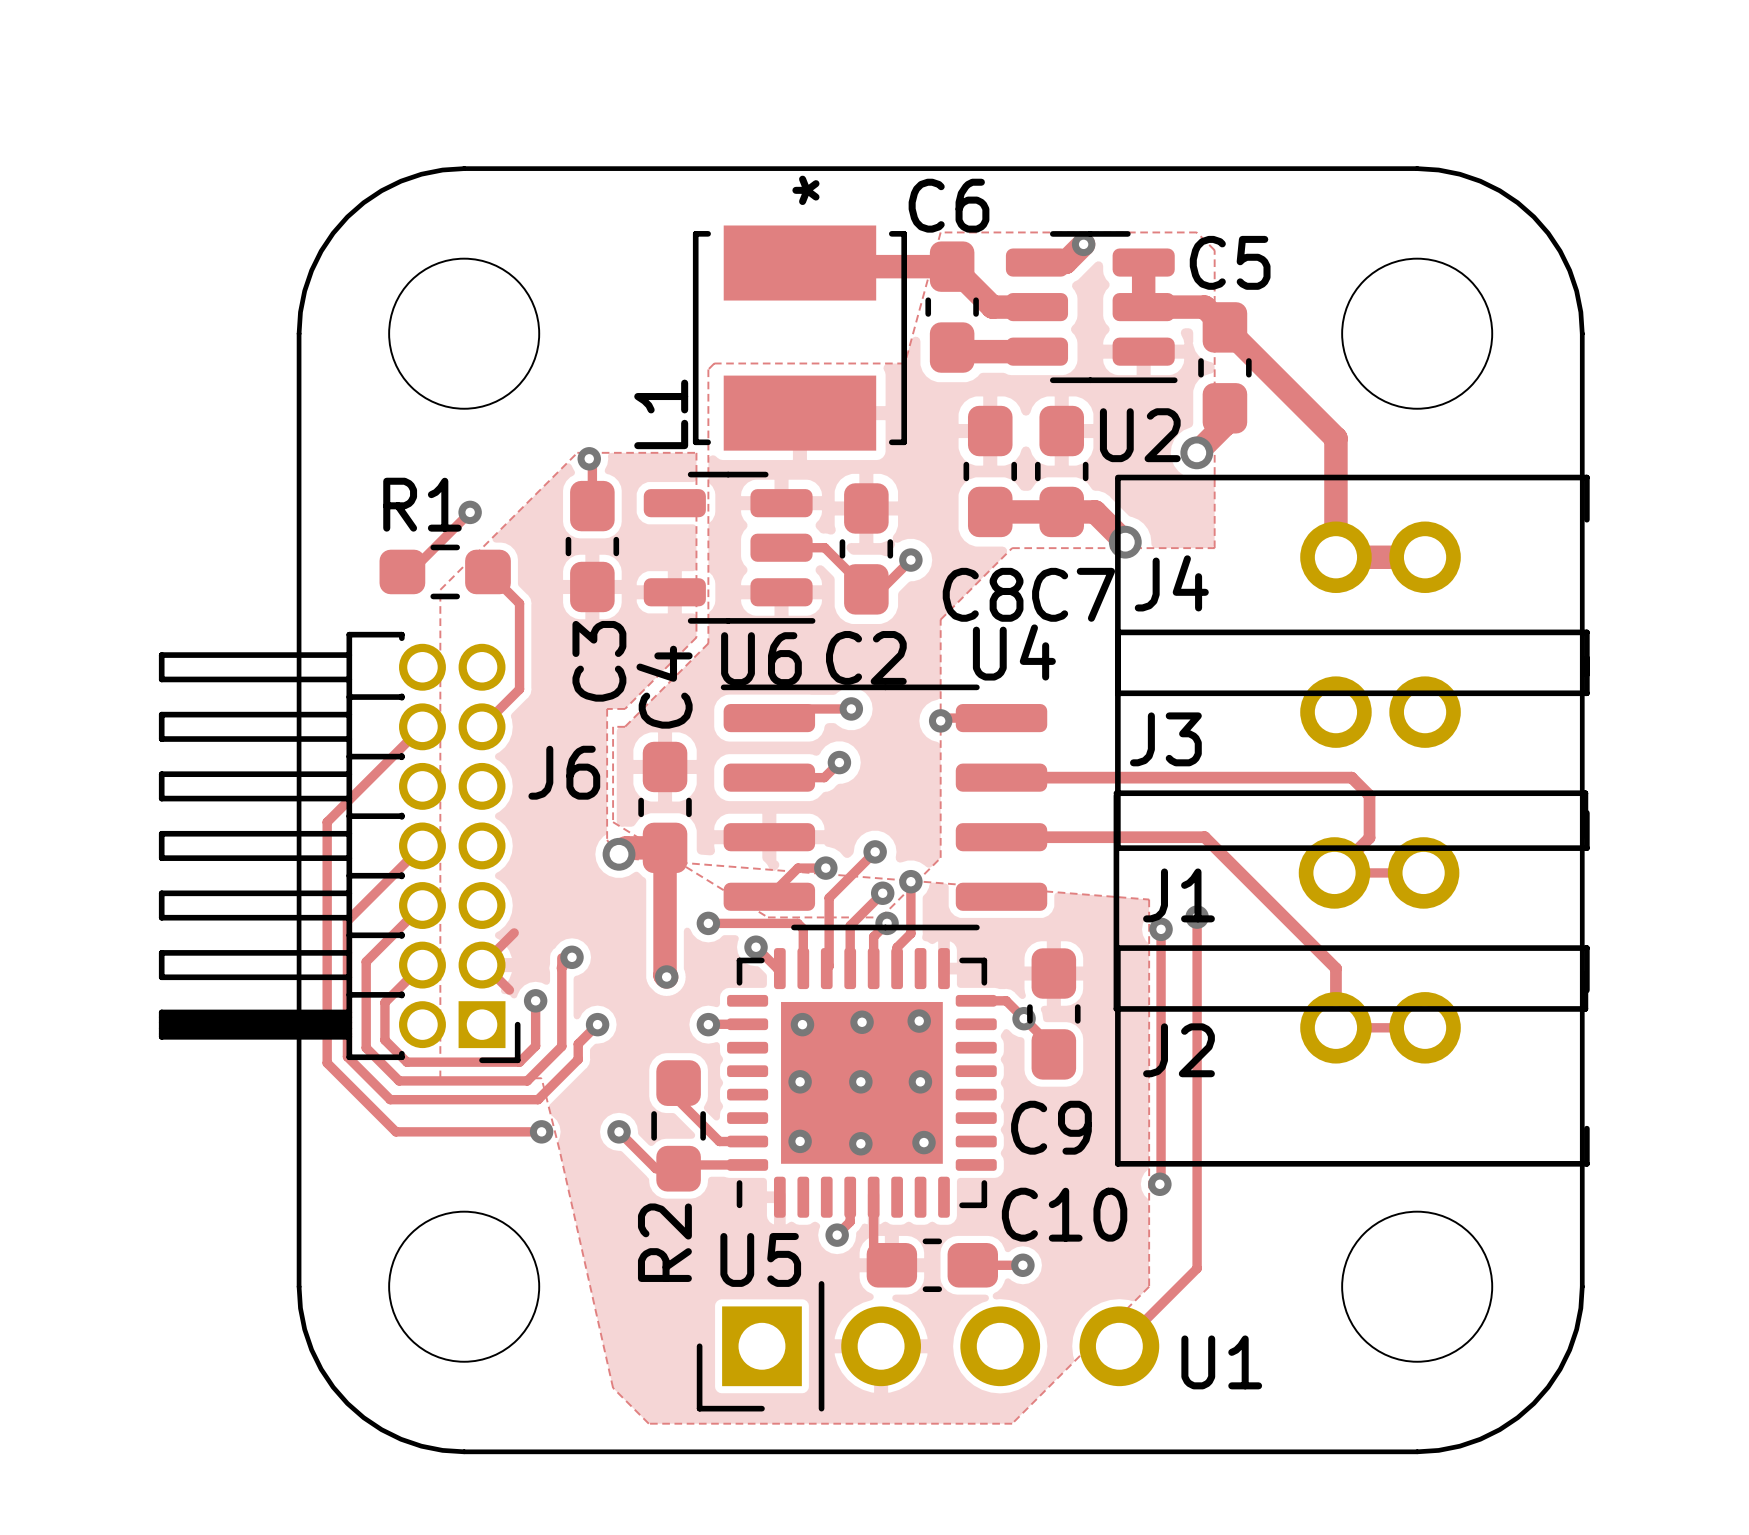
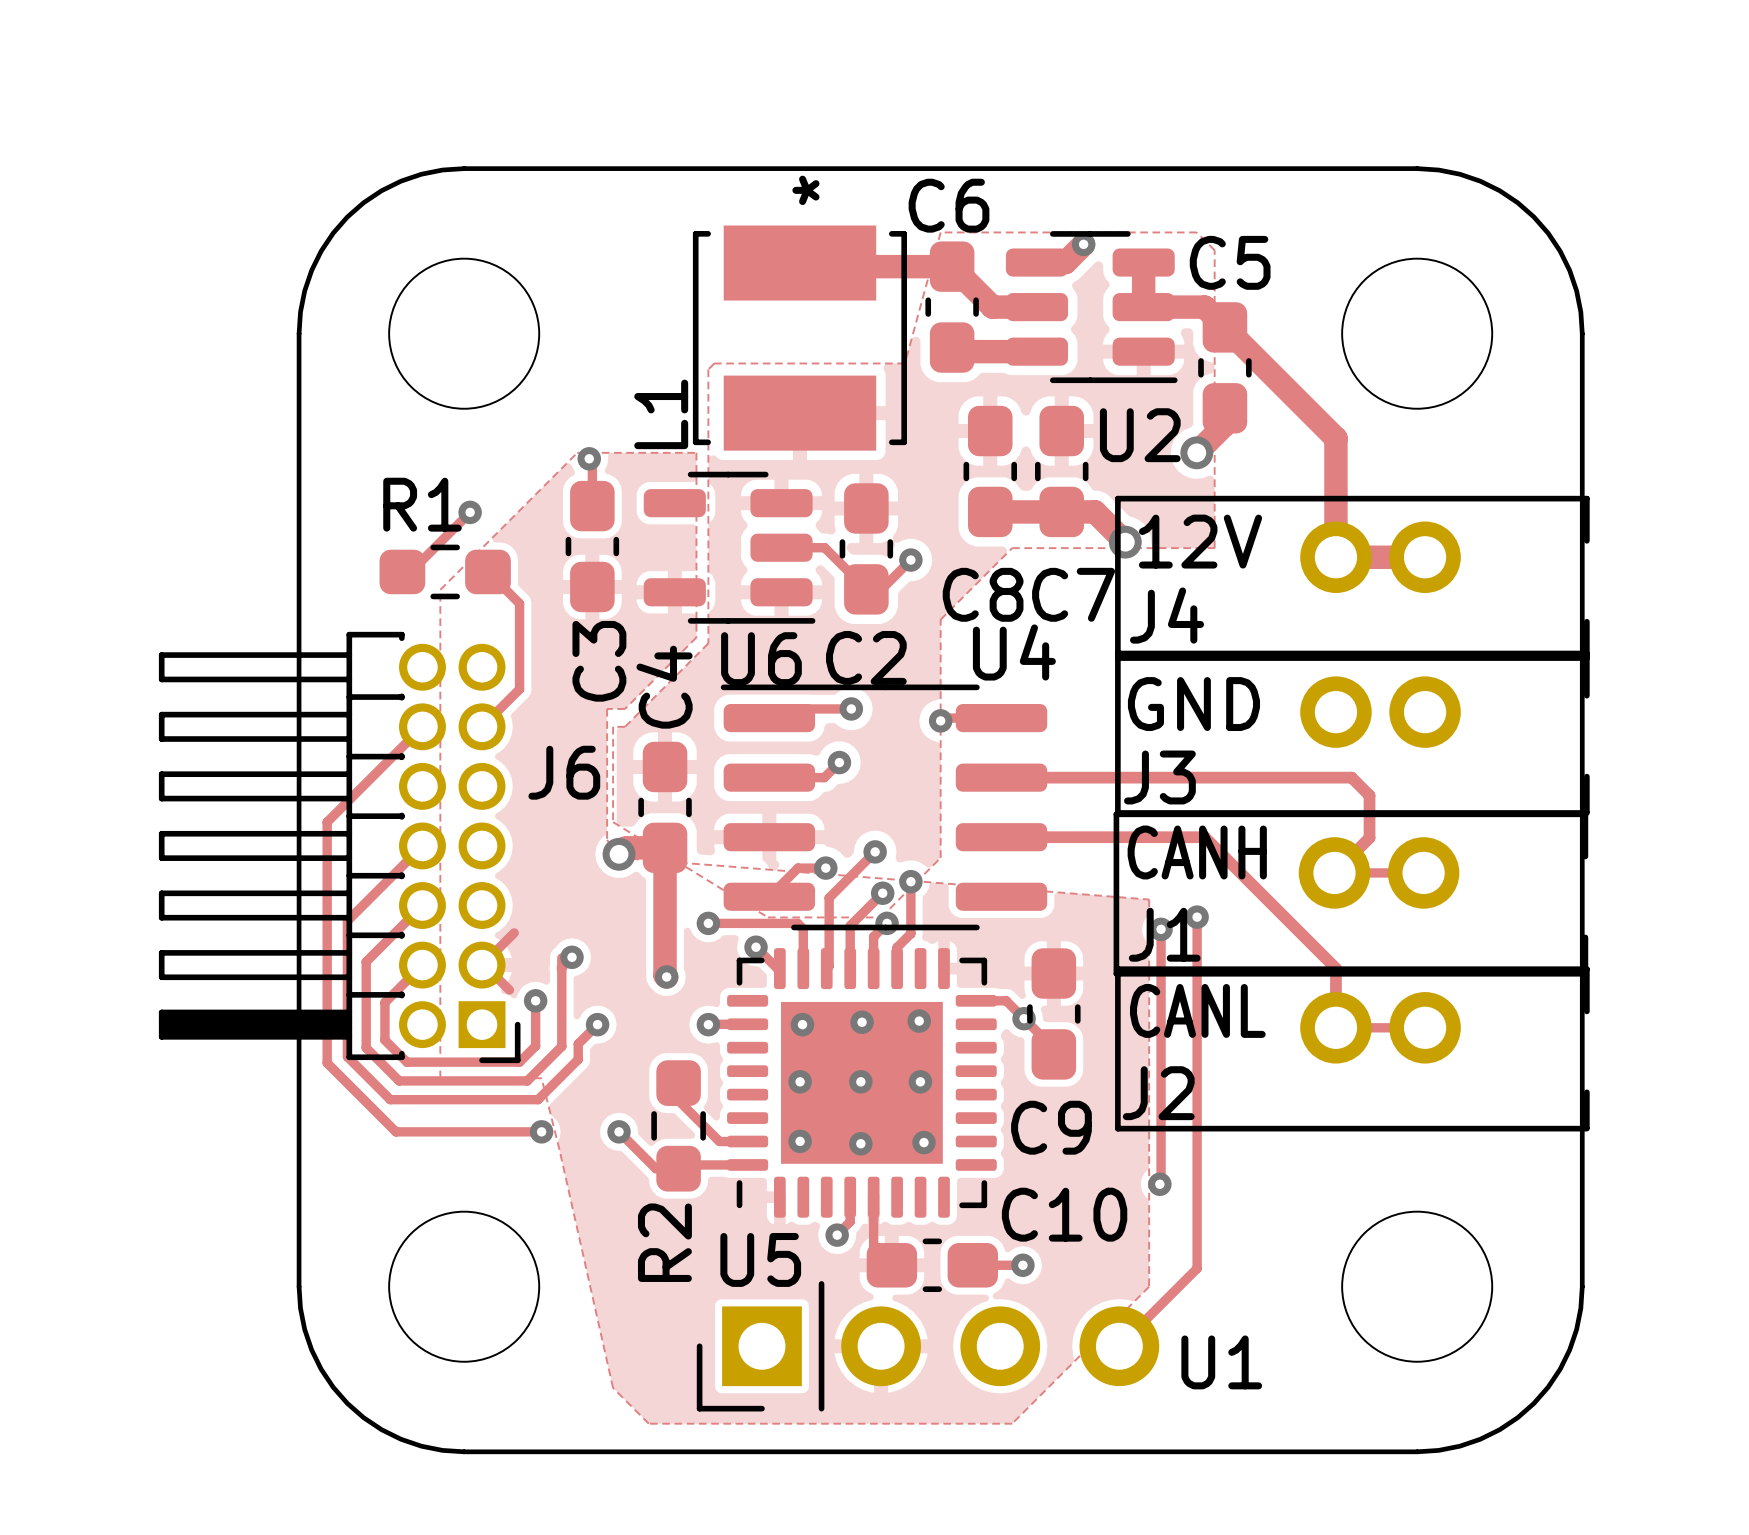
J4 footprint: [1115, 474, 1590, 697] -> [1115, 495, 1590, 661]
text: none -> 12V (1200, 541)
J4 name position: J4 (1171, 583) -> J4 (1167, 615)
J3 footprint: [1115, 629, 1590, 851] -> [1115, 650, 1590, 816]
text: none -> GND (1193, 704)
J3 name position: J3 (1165, 739) -> J3 (1159, 777)
J1 footprint: [1113, 790, 1589, 1012] -> [1113, 811, 1589, 977]
text: none -> CANH (1197, 852)
J1 name position: J1 (1179, 895) -> J1 (1164, 934)
J2 footprint: [1115, 945, 1590, 1167] -> [1115, 966, 1590, 1132]
text: none -> CANL (1197, 1010)
J2 name position: J2 (1179, 1050) -> J2 (1158, 1093)

